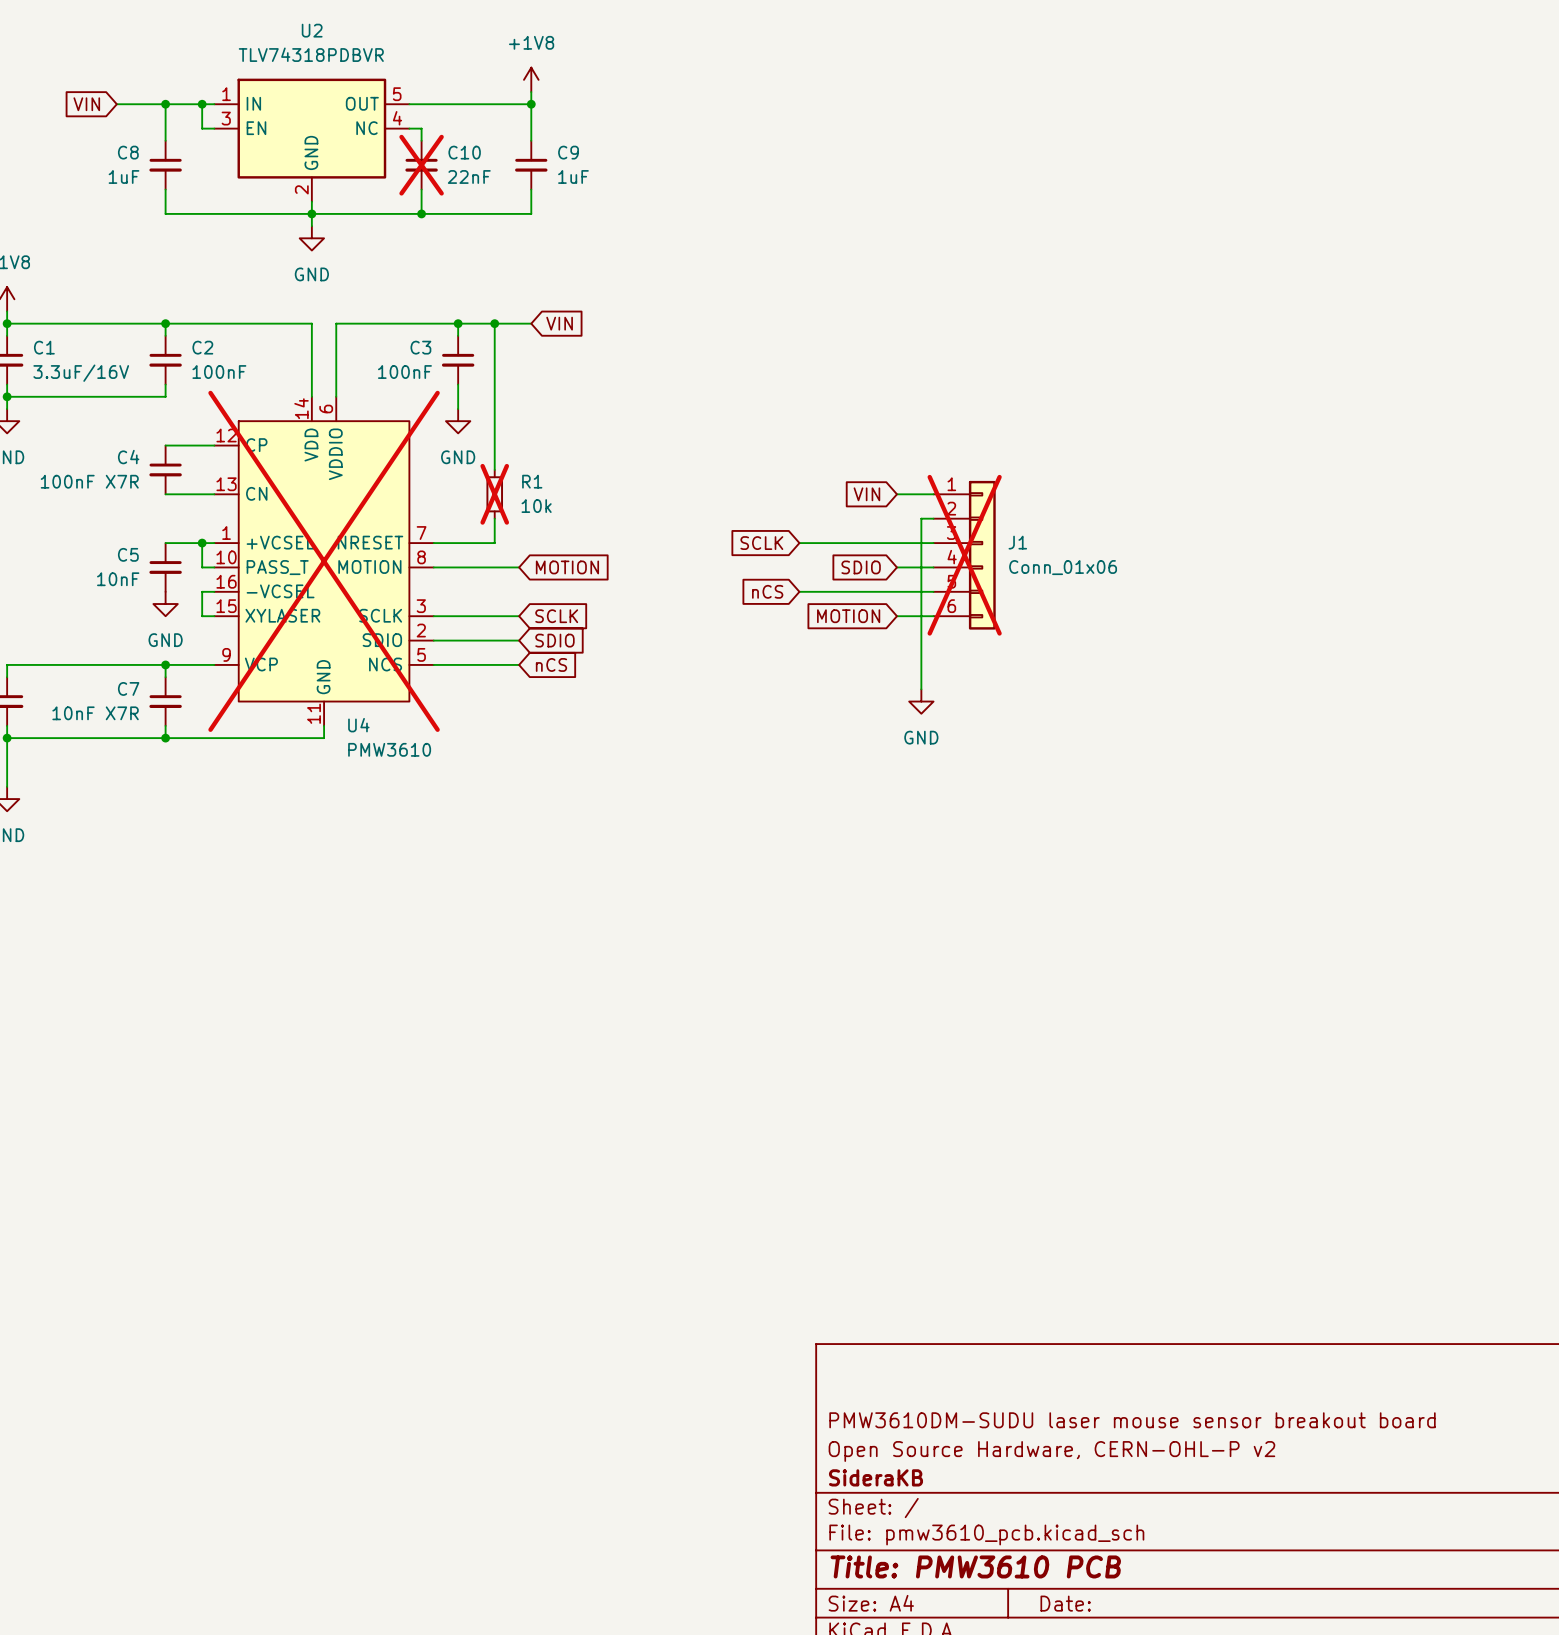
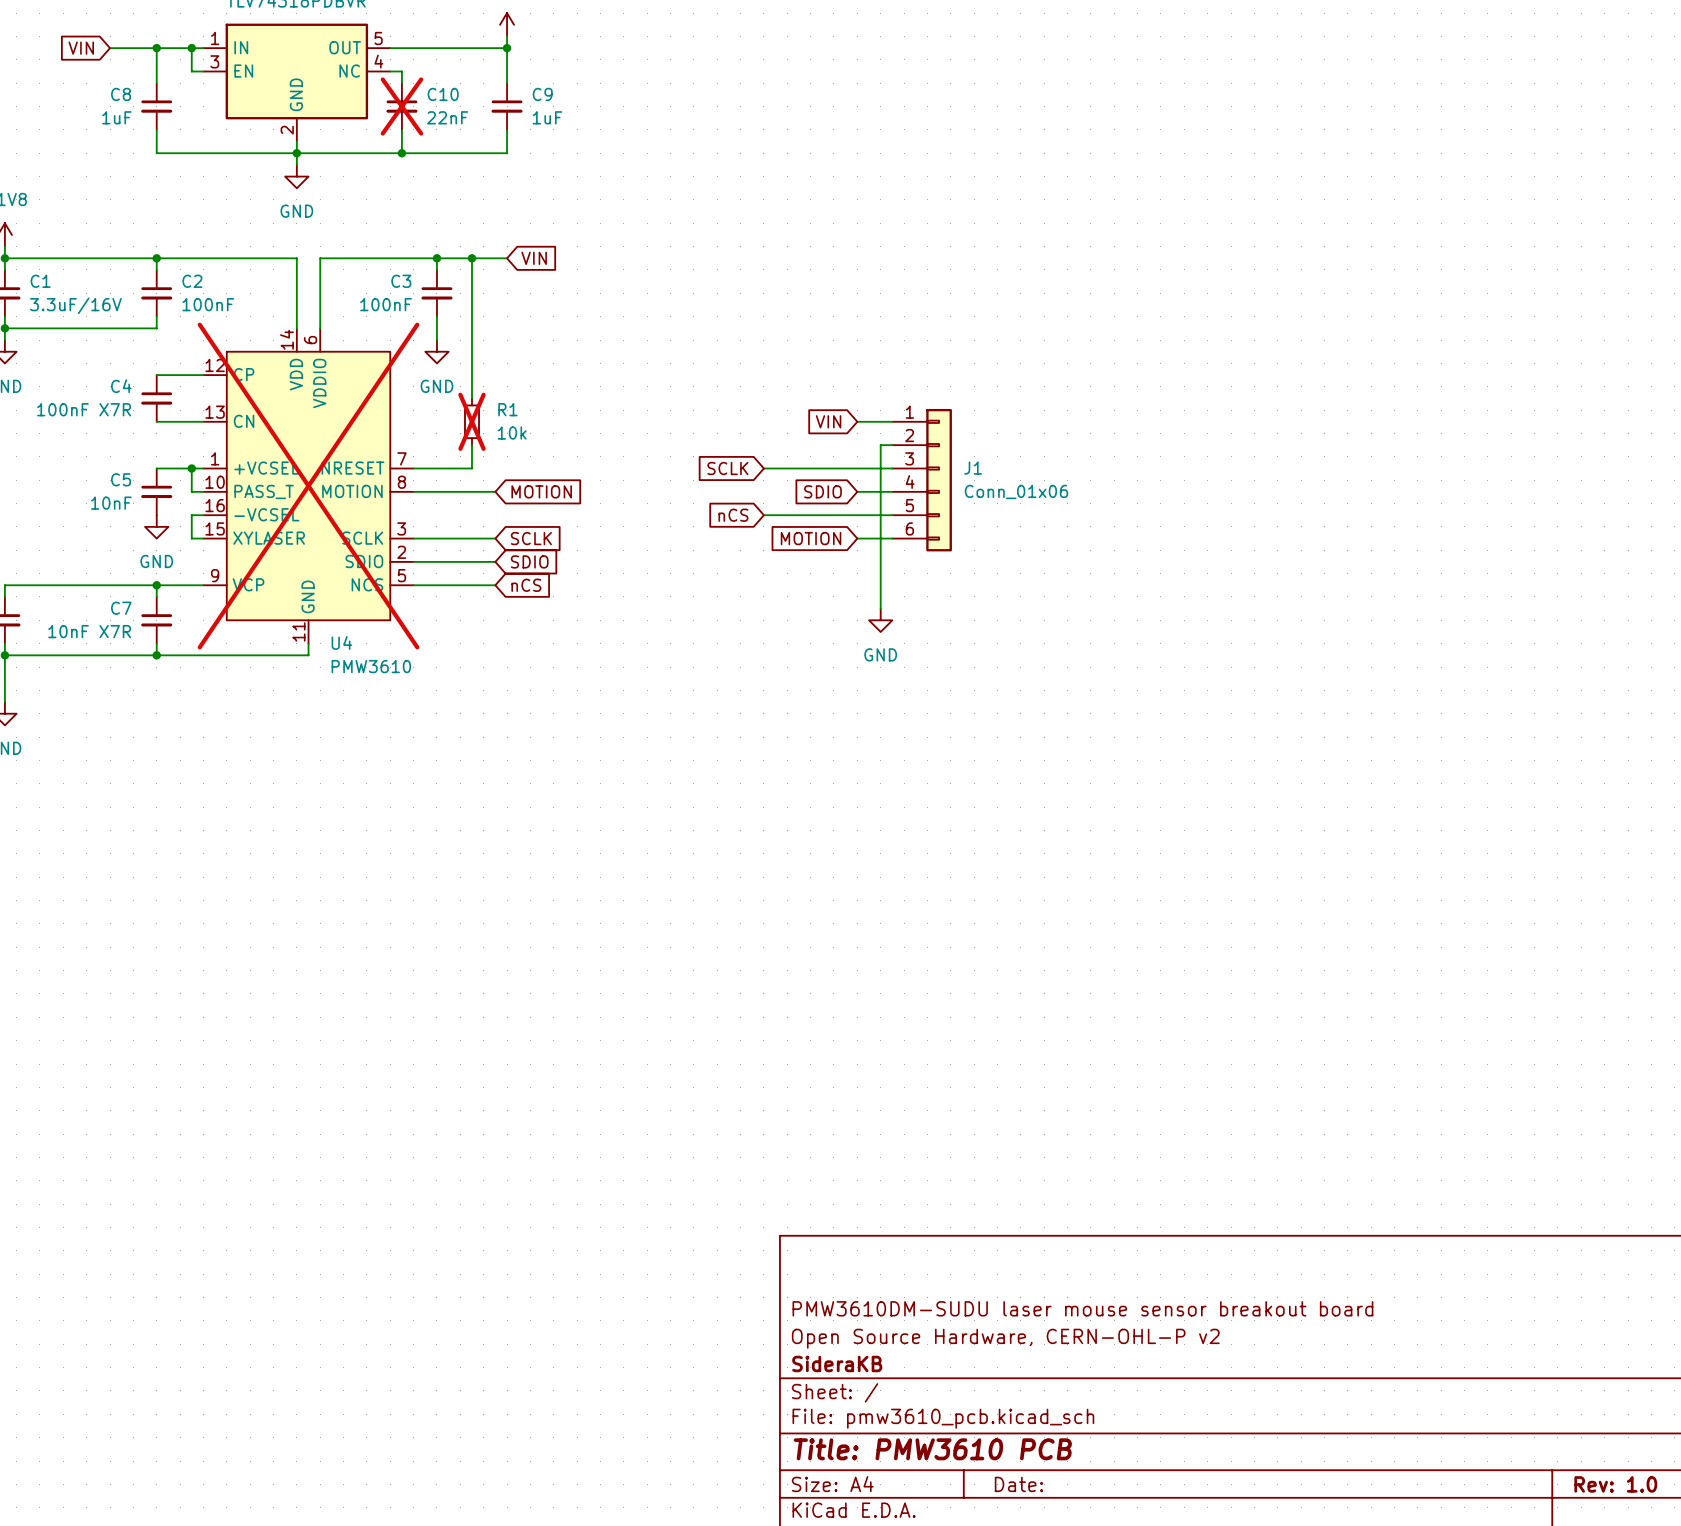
J1 do-not-place cross: (964, 555) -> none

